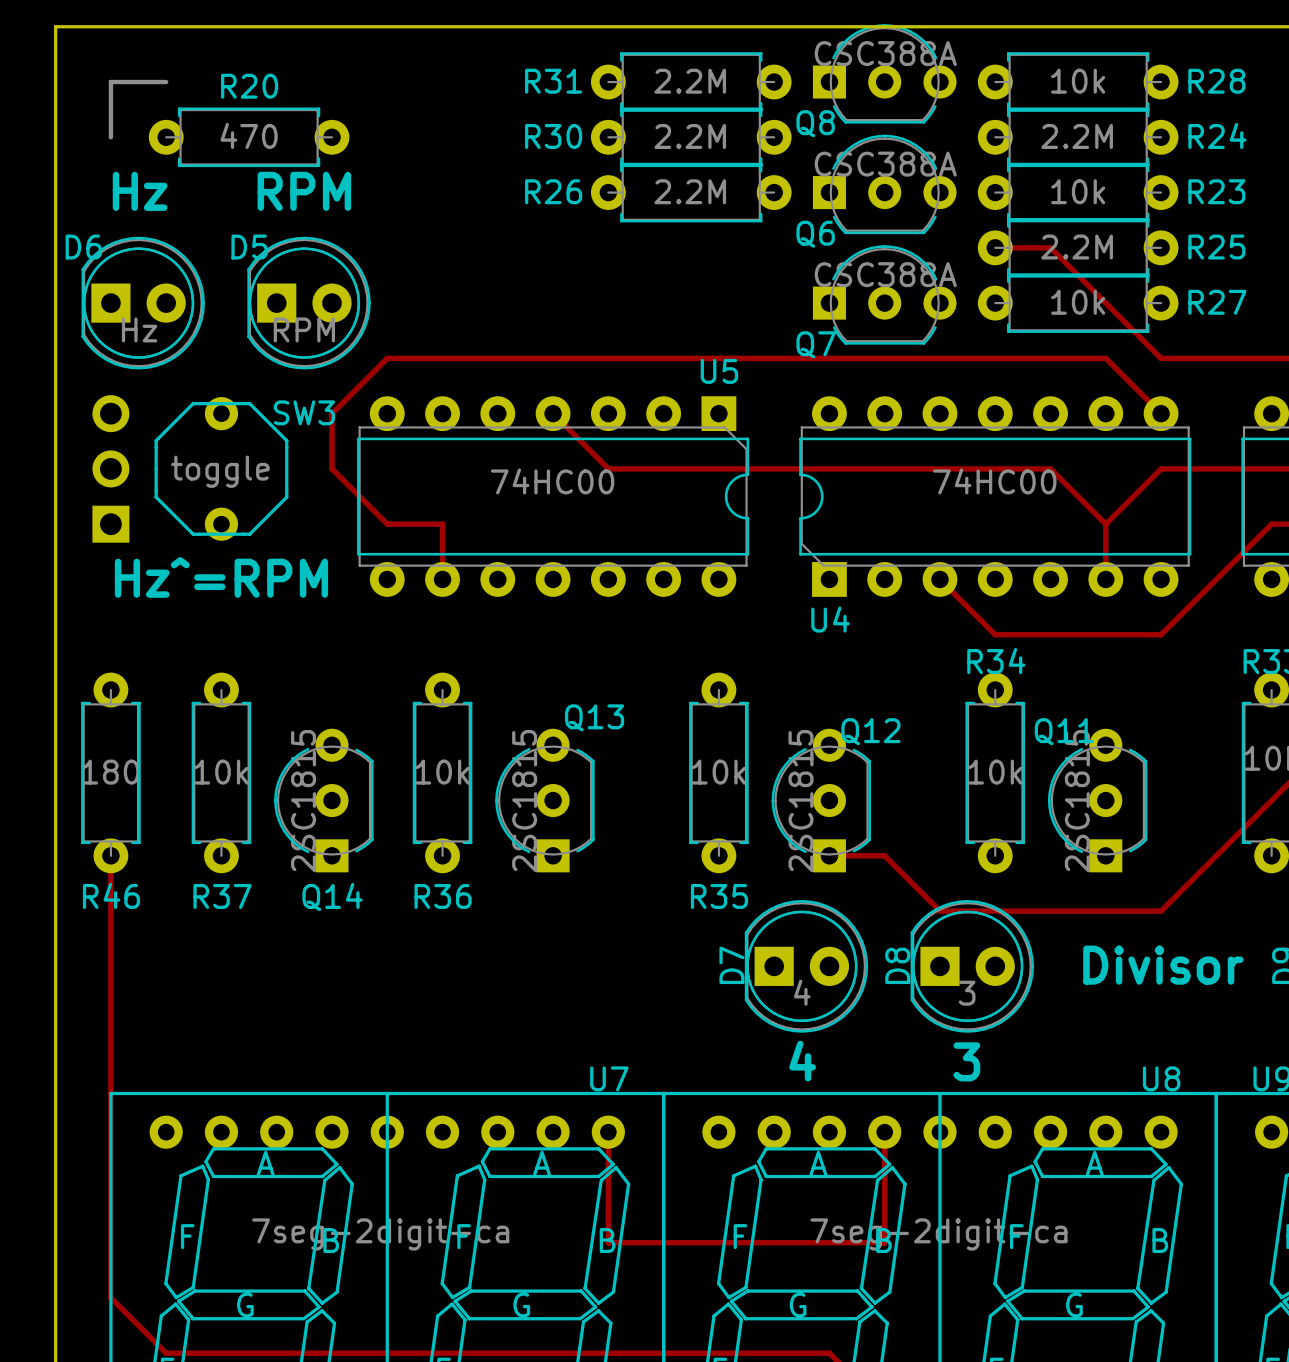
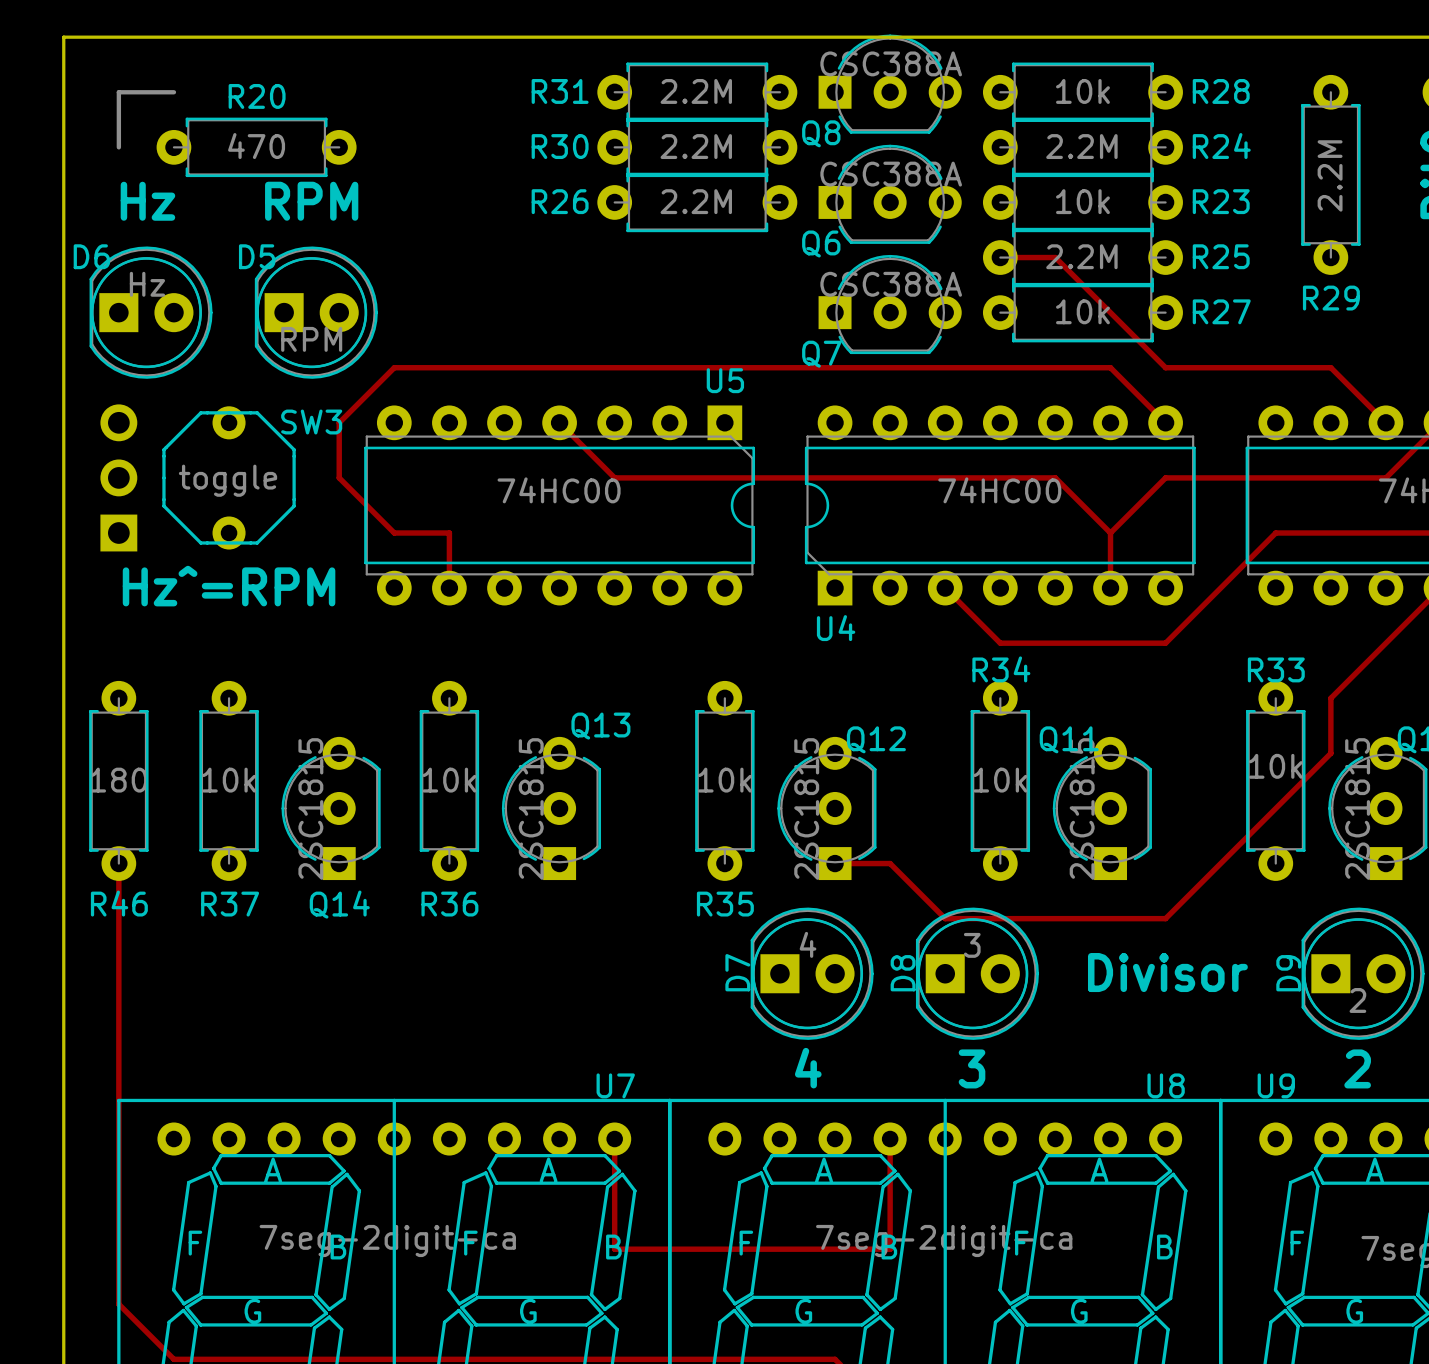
D6 value position: Hz (139, 329) -> Hz (147, 284)
D7 value position: 4 (802, 992) -> 4 (808, 944)
D8 value position: 3 (967, 993) -> 3 (972, 945)

